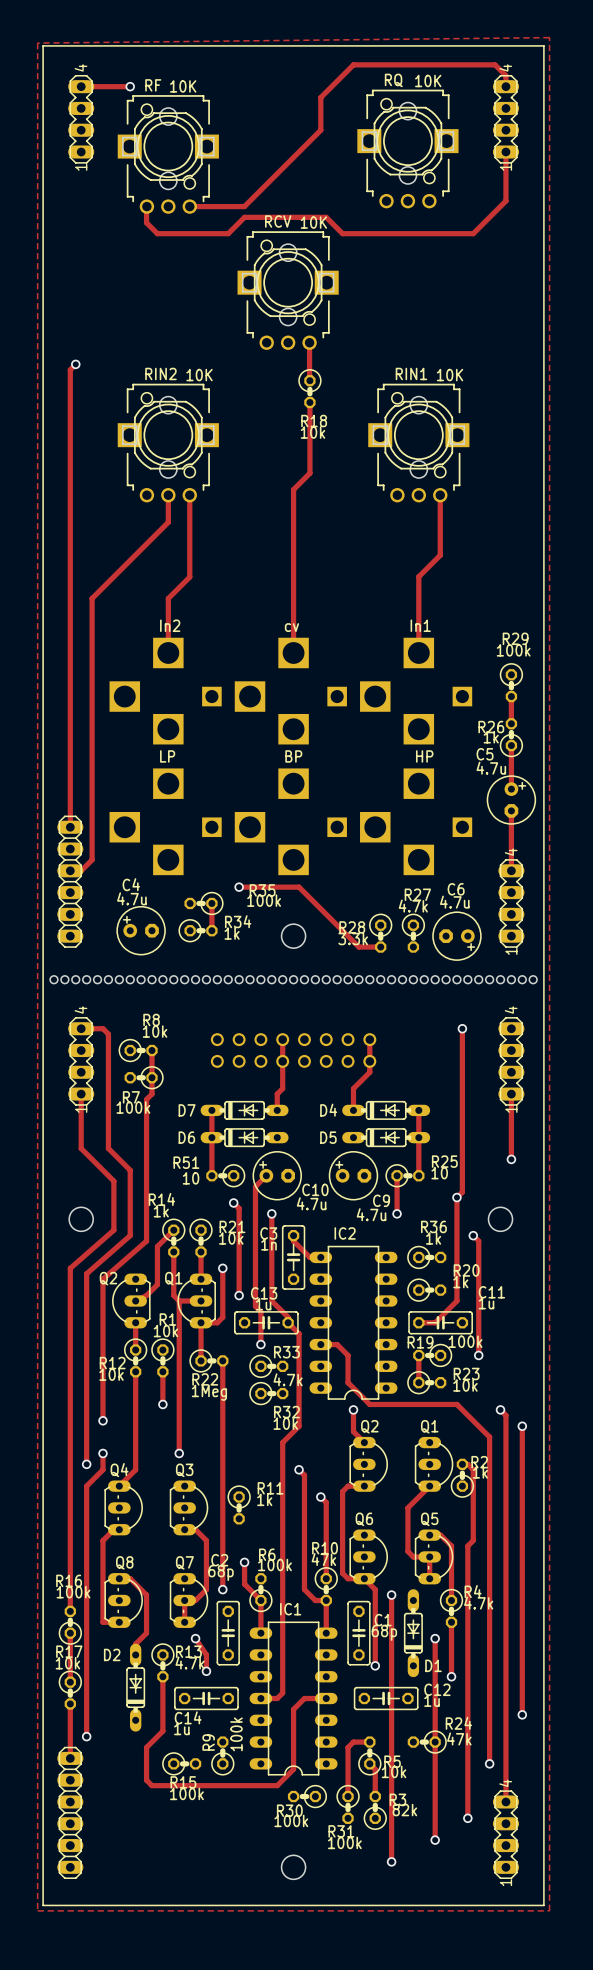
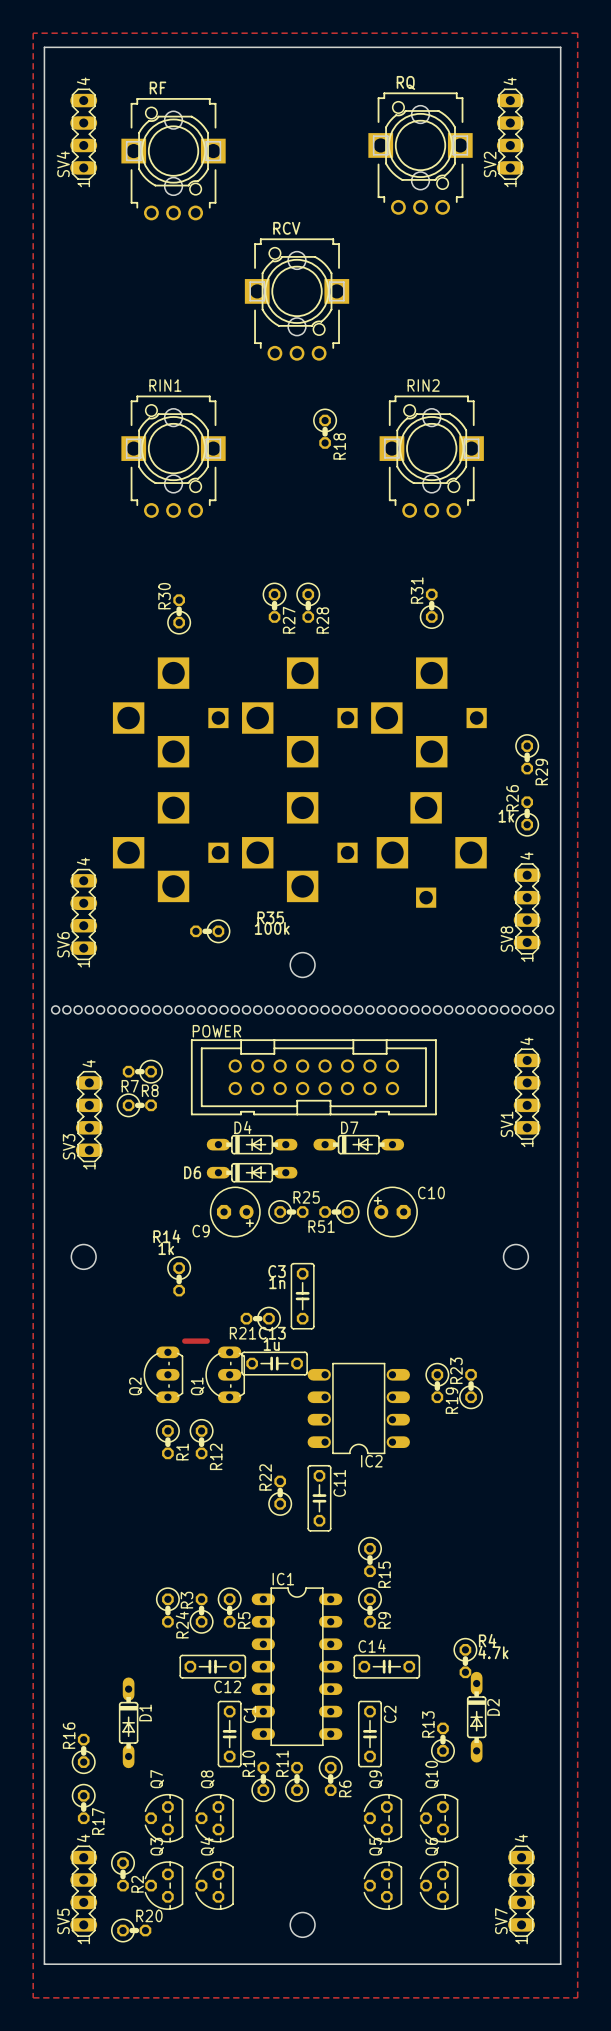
zone outline: (549, 37) (549, 1910) (37, 1910) (37, 43) (549, 37) -> (33, 33) (33, 1997) (577, 1997) (577, 33) (33, 33)
line: (43, 45) (543, 45) (543, 1905) (43, 1905) (43, 45) -> none
board edge: none -> (44, 47) (560, 47) (560, 1964) (44, 1964) (44, 47)
RQ value: 10K (428, 81) -> none
track: (81, 86) (130, 86) -> none
via: (130, 86) -> none
RF value: 10K (183, 86) -> none
track: (505, 86) (505, 75) (495, 64) (353, 64) (320, 97) (320, 130) (244, 206) (189, 206) -> none
part: (81, 119) -> none
part: (505, 119) -> none
SV4: none -> (83, 134)
SV2: none -> (510, 134)
track: (505, 152) (505, 201) (473, 233) (342, 233) (326, 217) (244, 217) (228, 233) (157, 233) (146, 222) (146, 206) -> none
RCV value: 10K (313, 222) -> none
track: (309, 342) (309, 380) -> none
track: (75, 364) (70, 369) (70, 827) -> none
via: (75, 364) -> none
RIN2 name: RIN2 (160, 373) -> RIN1 (165, 385)
RIN1 name: RIN1 (411, 373) -> RIN2 (423, 385)
RIN2 value: 10K (199, 375) -> none
RIN1 value: 10K (450, 375) -> none
R18 position: (309, 388) -> (325, 428)
track: (309, 402) (309, 473) (293, 489) (293, 652) -> none
R18 name rotation: 0° (314, 421) -> 90° counterclockwise (339, 446)
R18 value: 10k (312, 432) -> none
track: (168, 495) (168, 522) (92, 598) (92, 859) (81, 870) (70, 870) -> none
track: (189, 495) (189, 577) (168, 598) (168, 652) -> none
track: (440, 495) (440, 555) (418, 576) (418, 652) -> none
text: In2 (170, 625) -> none
text: In1 (420, 625) -> none
text: cv (291, 627) -> none
R29 name rotation: 0° (515, 638) -> 90° counterclockwise (541, 772)
R29 name position: R29 (515, 638) -> R29 (541, 772)
R29 value: 100k (513, 650) -> none
R29 position: (511, 682) -> (527, 754)
track: (511, 696) (511, 723) -> none
R26 name rotation: 0° (491, 727) -> 90° counterclockwise (512, 798)
R26 position: (511, 737) -> (527, 816)
track: (511, 745) (511, 789) -> none
text: LP (167, 756) -> none
text: BP (293, 756) -> none
text: HP (424, 756) -> none
C5: 4.7u (511, 800) -> none
track: (511, 810) (511, 870) -> none
part rotation: 0° (416, 821) -> 90° clockwise (431, 849)
part: (70, 881) -> none
SV8: none -> (527, 908)
SV6: none -> (83, 914)
track: (239, 887) (299, 887) (358, 947) (380, 947) -> none
via: (239, 887) -> none
R27 name rotation: 0° (417, 894) -> 90° counterclockwise (289, 620)
R27 name position: R27 (417, 894) -> R27 (289, 620)
track: (211, 903) (211, 930) -> none
part: (511, 903) -> none
R27 value: 4.7k (413, 906) -> none
R28 name rotation: 0° (352, 927) -> 90° counterclockwise (322, 620)
R28 name position: R28 (352, 927) -> R28 (322, 620)
C4: 4.7u (141, 930) -> none
R34: 1k (198, 930) -> none
R28 position: (380, 933) -> (308, 602)
R27 position: (413, 933) -> (274, 602)
C6: 4.7u (456, 936) -> none
R28 value: 3.3k (353, 938) -> none
R8 name position: R8 (151, 1020) -> R8 (150, 1090)
track: (81, 1028) (102, 1028) (108, 1034) (108, 1148) (130, 1170) (130, 1235) (86, 1273) (86, 1464) -> none
track: (462, 1028) (462, 1192) (456, 1197) (456, 1301) (435, 1322) (418, 1322) -> none
via: (462, 1028) -> none
R8 value: 10k (155, 1031) -> none
track: (282, 1039) (282, 1088) (277, 1094) (277, 1110) -> none
track: (369, 1039) (369, 1072) (353, 1088) (353, 1110) -> none
R8 position: (138, 1050) -> (136, 1105)
track: (152, 1050) (152, 1094) (146, 1099) (146, 1241) (102, 1279) (102, 1420) -> none
POWER side: bottom (293, 1050) -> top (313, 1077)
part: (81, 1061) -> none
R7 position: (144, 1077) -> (142, 1071)
SV3: none -> (89, 1116)
SV1 name: none -> SV1 (506, 1124)
track: (81, 1094) (81, 1148) (113, 1181) (113, 1230) (70, 1268) (70, 1611) -> none
track: (511, 1094) (511, 1159) -> none
R7 name position: R7 (131, 1097) -> R7 (130, 1086)
R7 value: 100k (133, 1107) -> none
D7 name: D7 (187, 1110) -> D4 (242, 1127)
track: (211, 1110) (211, 1175) -> none
D7: none -> (358, 1144)
D4: (386, 1110) -> none
track: (418, 1110) (418, 1175) -> none
D5: (386, 1137) -> none
via: (511, 1159) -> none
R25 name position: R25 (444, 1161) -> R25 (306, 1197)
R51 name position: R51 (186, 1162) -> R51 (321, 1226)
R25 value: 10 (439, 1173) -> none
R51 position: (225, 1175) -> (339, 1212)
track: (266, 1175) (255, 1186) (255, 1306) (260, 1311) (260, 1344) -> none
C10 position: (277, 1175) -> (392, 1212)
C9 rotation: 0° (353, 1175) -> 180° (235, 1212)
C9 position: (353, 1175) -> (235, 1212)
track: (397, 1175) (397, 1213) -> none
R25 position: (405, 1175) -> (288, 1212)
R51 value: 10 (191, 1178) -> none
C10 name position: C10 (315, 1189) -> C10 (431, 1192)
via: (456, 1197) -> none
C9 name position: C9 (381, 1200) -> C9 (201, 1231)
track: (233, 1202) (239, 1208) (239, 1295) -> none
via: (233, 1202) -> none
C10 value: 4.7u (311, 1203) -> none
track: (271, 1213) (271, 1301) (288, 1317) (288, 1322) (299, 1333) (299, 1426) (282, 1442) (282, 1693) (277, 1698) (260, 1698) -> none
via: (271, 1213) -> none
via: (397, 1213) -> none
C9 value: 4.7u (371, 1214) -> none
R21 name position: R21 (232, 1226) -> R21 (243, 1333)
track: (173, 1230) (157, 1246) (157, 1284) (146, 1295) (135, 1301) -> none
IC2 name position: IC2 (345, 1233) -> IC2 (371, 1461)
track: (293, 1235) (293, 1241) (309, 1257) (320, 1257) -> none
track: (473, 1235) (478, 1241) (478, 1355) -> none
via: (473, 1235) -> none
R21 rotation: 0° (201, 1238) -> 90° clockwise (260, 1318)
R21 position: (201, 1238) -> (260, 1318)
R21 value: 10k (231, 1238) -> none
IC2 footprint: [309, 1245, 398, 1400] -> [307, 1362, 410, 1455]
track: (173, 1251) (173, 1295) (179, 1301) (179, 1453) -> none
track: (201, 1251) (201, 1279) -> none
R36: 1k (426, 1257) -> none
track: (222, 1268) (222, 1317) (217, 1322) (201, 1322) (201, 1360) -> none
via: (222, 1268) -> none
R20 name position: R20 (466, 1270) -> R20 (149, 1915)
Q2 name rotation: 0° (108, 1278) -> 90° counterclockwise (135, 1386)
Q2 name position: Q2 (108, 1278) -> Q2 (135, 1386)
Q1 name rotation: 0° (173, 1278) -> 90° counterclockwise (197, 1386)
Q1 name position: Q1 (173, 1278) -> Q1 (197, 1386)
R20 value: 1k (460, 1282) -> none
R20 position: (426, 1290) -> (131, 1930)
C11 name position: C11 (491, 1292) -> C11 (339, 1483)
via: (239, 1295) -> none
Q2 position: (131, 1301) -> (163, 1374)
Q1 position: (196, 1301) -> (225, 1374)
C11 value: 1u (486, 1303) -> none
R1 name rotation: 0° (167, 1319) -> 90° counterclockwise (182, 1452)
R1 name position: R1 (167, 1319) -> R1 (182, 1452)
track: (135, 1322) (135, 1350) -> none
C11 rotation: 0° (440, 1322) -> 90° clockwise (319, 1498)
C11 position: (440, 1322) -> (319, 1498)
R1 value: 10k (165, 1331) -> none
R19 value: 100k (465, 1341) -> none
R19 name position: R19 (420, 1342) -> R19 (451, 1400)
via: (260, 1344) -> none
track: (320, 1344) (337, 1344) (348, 1355) (348, 1382) (369, 1404) (456, 1404) (489, 1437) (489, 1763) -> none
track: (418, 1355) (418, 1382) -> none
R19 rotation: 0° (432, 1355) -> 90° counterclockwise (437, 1382)
via: (478, 1355) -> none
R12 position: (135, 1357) -> (201, 1439)
R1 position: (162, 1357) -> (167, 1439)
R22 rotation: 0° (208, 1360) -> 90° counterclockwise (280, 1495)
R22 position: (208, 1360) -> (280, 1495)
track: (222, 1360) (222, 1589) -> none
R12 name rotation: 0° (112, 1363) -> 90° counterclockwise (216, 1456)
R12 name position: R12 (112, 1363) -> R12 (216, 1456)
R33: 4.7k (268, 1366) -> none
track: (135, 1371) (135, 1469) (119, 1486) -> none
track: (162, 1371) (162, 1404) -> none
R23 name position: R23 (466, 1373) -> R23 (456, 1370)
R12 value: 10k (111, 1374) -> none
R22 name position: R22 (205, 1379) -> R22 (265, 1477)
R23 rotation: 0° (426, 1382) -> 90° counterclockwise (471, 1389)
R23 position: (426, 1382) -> (471, 1389)
R23 value: 10k (465, 1385) -> none
R22 value: 1Meg (209, 1392) -> none
R32: 10k (268, 1393) -> none
via: (162, 1404) -> none
track: (353, 1409) (353, 1431) (364, 1442) -> none
via: (353, 1409) -> none
track: (500, 1409) (505, 1415) (505, 1801) -> none
via: (500, 1409) -> none
via: (102, 1420) -> none
text: Q2 (369, 1426) -> none
text: Q1 (429, 1426) -> none
track: (522, 1426) (522, 1714) -> none
via: (522, 1426) -> none
track: (102, 1453) (102, 1469) (86, 1486) (86, 1736) -> none
via: (102, 1453) -> none
via: (179, 1453) -> none
R2 name position: R2 (479, 1462) -> R2 (137, 1884)
via: (86, 1464) -> none
part: (368, 1464) -> none
part: (434, 1464) -> none
track: (462, 1464) (467, 1464) (473, 1469) (473, 1540) (467, 1546) (467, 1818) -> none
track: (299, 1469) (304, 1475) (304, 1589) (315, 1600) (326, 1600) (326, 1633) -> none
via: (299, 1469) -> none
text: Q4 (119, 1470) -> none
text: Q3 (184, 1470) -> none
R2 value: 1k (480, 1472) -> none
R2 rotation: 0° (462, 1478) -> 180° (123, 1871)
R2 position: (462, 1478) -> (123, 1871)
track: (364, 1486) (348, 1486) (342, 1491) (342, 1573) (348, 1578) (364, 1578) (375, 1589) (375, 1665) -> none
track: (429, 1486) (407, 1507) (407, 1551) (413, 1556) (429, 1556) (429, 1578) -> none
R11 name position: R11 (270, 1488) -> R11 (282, 1763)
track: (320, 1497) (326, 1502) (326, 1578) -> none
via: (320, 1497) -> none
R11 value: 1k (264, 1499) -> none
R11 rotation: 0° (239, 1504) -> 180° (297, 1781)
R11 position: (239, 1504) -> (297, 1781)
part: (123, 1507) -> none
part: (189, 1507) -> none
text: Q6 (364, 1519) -> none
text: Q5 (429, 1519) -> none
track: (119, 1529) (113, 1529) (102, 1540) (102, 1622) (119, 1622) -> none
track: (184, 1529) (195, 1529) (206, 1540) (206, 1589) (195, 1600) (184, 1600) (184, 1622) -> none
track: (429, 1535) (440, 1535) (451, 1546) (451, 1600) -> none
R10 name position: R10 (325, 1548) -> R10 (248, 1763)
R6 name position: R6 (267, 1554) -> R6 (345, 1788)
part: (368, 1556) -> none
part: (434, 1556) -> none
R10 value: 47k (323, 1559) -> none
C2 name position: C2 (219, 1560) -> C2 (390, 1714)
text: Q8 (124, 1562) -> none
text: Q7 (184, 1562) -> none
track: (244, 1562) (244, 1584) (260, 1600) (260, 1633) -> none
via: (244, 1562) -> none
R6 value: 100k (274, 1564) -> none
C2 value: 68p (221, 1572) -> none
track: (119, 1578) (130, 1578) (146, 1595) (146, 1633) (135, 1644) (135, 1654) -> none
R16 name rotation: 0° (69, 1580) -> 90° counterclockwise (69, 1735)
R10 rotation: 0° (326, 1586) -> 180° (263, 1781)
R10 position: (326, 1586) -> (263, 1781)
via: (222, 1589) -> none
R16 value: 100k (73, 1592) -> none
R6 rotation: 0° (260, 1592) -> 180° (330, 1775)
R6 position: (260, 1592) -> (330, 1775)
track: (391, 1595) (391, 1861) -> none
via: (391, 1595) -> none
part: (123, 1600) -> none
part: (189, 1600) -> none
track: (451, 1622) (451, 1676) -> none
R16 position: (70, 1625) -> (83, 1753)
C1 value: 68p (384, 1632) -> none
track: (70, 1633) (70, 1682) -> none
C2 rotation: 0° (228, 1633) -> 180° (370, 1734)
C2 position: (228, 1633) -> (370, 1734)
C1 rotation: 0° (358, 1633) -> 180° (229, 1734)
C1 position: (358, 1633) -> (229, 1734)
D1 rotation: 0° (413, 1633) -> 180° (128, 1722)
D1 position: (413, 1633) -> (128, 1722)
track: (195, 1638) (206, 1654) (206, 1671) -> none
via: (195, 1638) -> none
track: (435, 1638) (435, 1840) -> none
via: (435, 1638) -> none
R17 name rotation: 0° (69, 1651) -> 90° counterclockwise (98, 1821)
R17 name position: R17 (69, 1651) -> R17 (98, 1821)
R13 name position: R13 (188, 1651) -> R13 (428, 1724)
D2 name position: D2 (112, 1654) -> D2 (493, 1707)
R13 rotation: 0° (162, 1662) -> 180° (442, 1742)
R13 position: (162, 1662) -> (442, 1742)
R13 value: 4.7k (190, 1662) -> none
R17 value: 10k (67, 1663) -> none
via: (375, 1665) -> none
D1 name position: D1 (433, 1665) -> D1 (145, 1712)
via: (206, 1671) -> none
track: (162, 1676) (162, 1731) (146, 1747) (146, 1780) (152, 1785) (277, 1785) (293, 1769) (293, 1709) (304, 1698) (326, 1698) -> none
via: (451, 1676) -> none
D2 rotation: 0° (135, 1687) -> 180° (476, 1717)
D2 position: (135, 1687) -> (476, 1717)
C12 name position: C12 (437, 1689) -> C12 (227, 1686)
R17 position: (70, 1690) -> (83, 1803)
C14 rotation: 0° (206, 1698) -> 180° (386, 1666)
C14 position: (206, 1698) -> (386, 1666)
IC1 rotation: 0° (293, 1698) -> 180° (297, 1666)
C12 rotation: 0° (386, 1698) -> 180° (212, 1666)
C12 position: (386, 1698) -> (212, 1666)
C12 value: 1u (432, 1700) -> none
track: (70, 1703) (70, 1758) -> none
via: (522, 1714) -> none
C14 name position: C14 (188, 1717) -> C14 (372, 1646)
R24 name position: R24 (458, 1723) -> R24 (182, 1625)
C14 value: 1u (181, 1729) -> none
R9 value: 100k (236, 1734) -> none
via: (86, 1736) -> none
R24 value: 47k (459, 1738) -> none
track: (369, 1742) (353, 1742) (348, 1747) (348, 1796) -> none
R24 rotation: 0° (427, 1742) -> 90° counterclockwise (167, 1607)
R24 position: (427, 1742) -> (167, 1607)
R9 rotation: 0° (222, 1755) -> 180° (370, 1607)
R9 position: (222, 1755) -> (370, 1607)
R5 rotation: 0° (369, 1755) -> 180° (229, 1607)
R5 position: (369, 1755) -> (229, 1607)
Q7: none -> (163, 1818)
R15 rotation: 0° (181, 1763) -> 90° clockwise (370, 1557)
R15 position: (181, 1763) -> (370, 1557)
Q8: none -> (214, 1818)
track: (369, 1763) (375, 1769) (375, 1796) -> none
Q9: none -> (382, 1818)
Q10: none -> (439, 1818)
via: (489, 1763) -> none
R5 value: 10k (394, 1771) -> none
R15 value: 100k (186, 1793) -> none
R30 rotation: 0° (307, 1796) -> 90° clockwise (179, 614)
R30 position: (307, 1796) -> (179, 614)
R3 name rotation: 0° (397, 1799) -> 90° counterclockwise (187, 1600)
R3 name position: R3 (397, 1799) -> R3 (187, 1600)
R31 rotation: 0° (348, 1804) -> 180° (431, 608)
R31 position: (348, 1804) -> (431, 608)
R3 position: (375, 1810) -> (201, 1613)
R3 value: 82k (404, 1810) -> none
part: (70, 1812) -> none
via: (467, 1818) -> none
R30 value: 100k (291, 1820) -> none
Q3: none -> (163, 1885)
Q4: none -> (214, 1885)
Q5: none -> (382, 1885)
Q6: none -> (439, 1885)
R31 name position: R31 (341, 1831) -> R31 (417, 590)
SV5: none -> (83, 1891)
via: (435, 1840) -> none
R31 value: 100k (344, 1842) -> none
via: (391, 1861) -> none
SV7 name: none -> SV7 (501, 1921)

